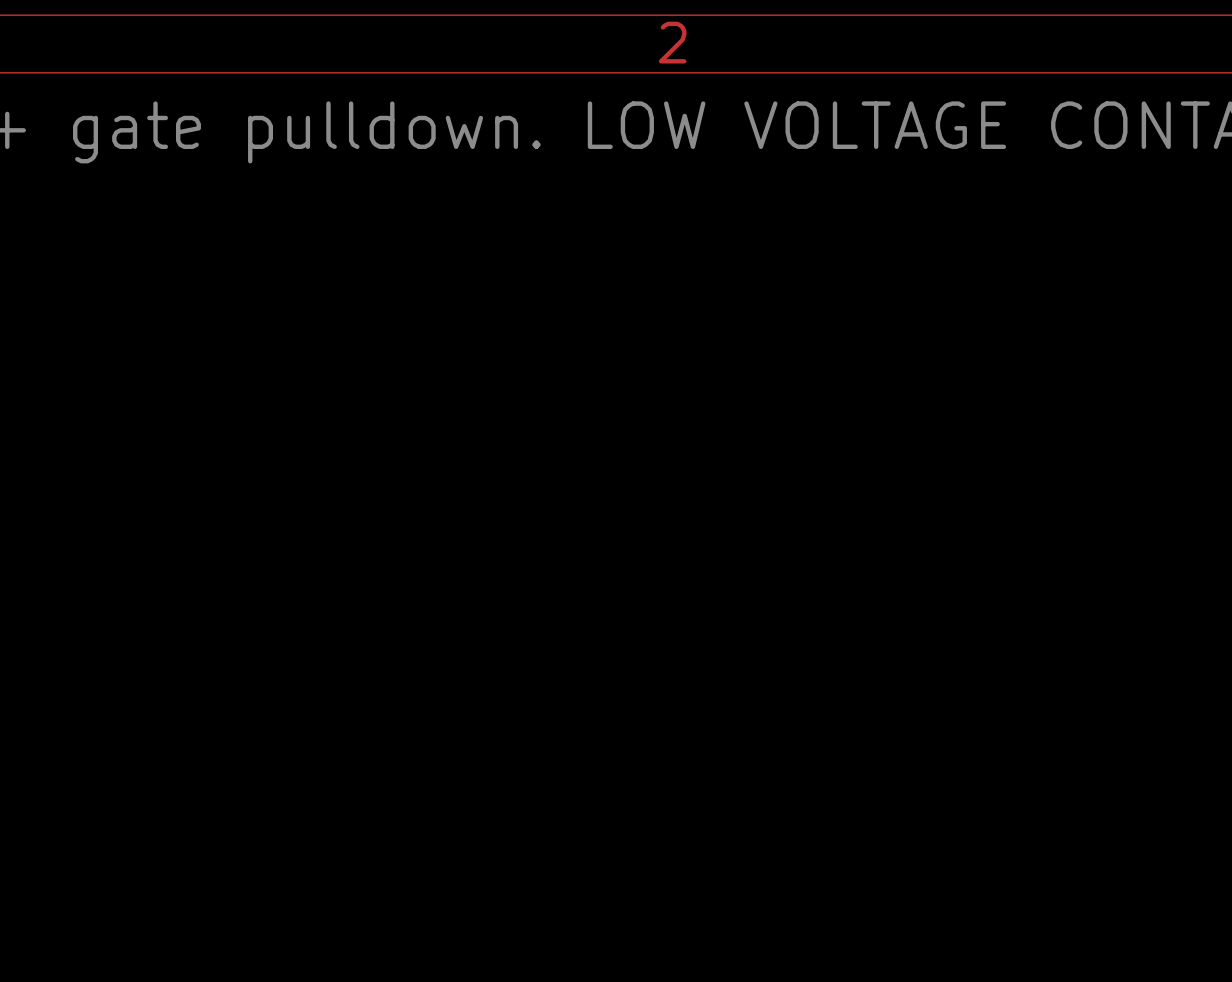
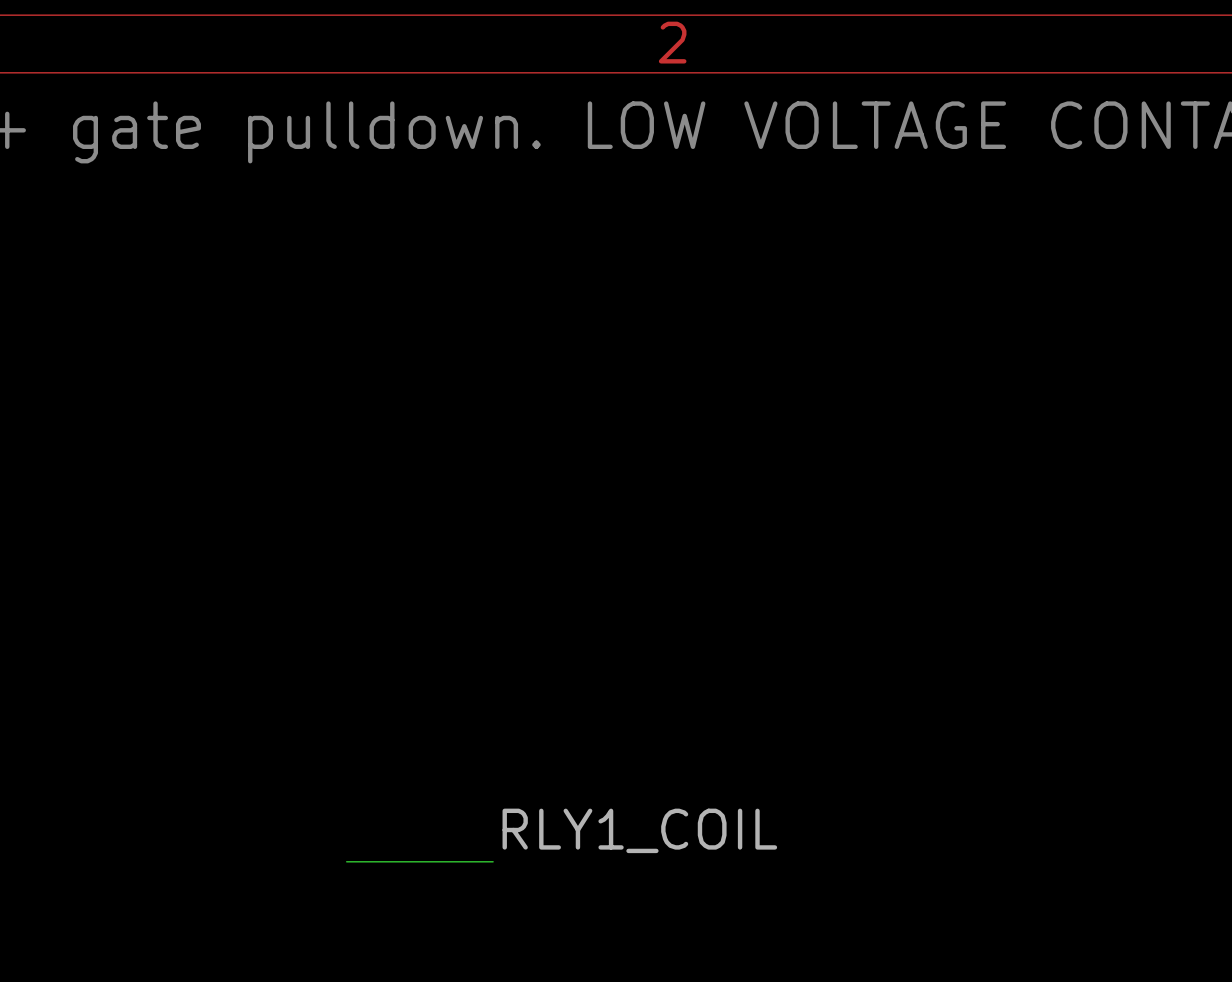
label: none -> RLY1_COIL (639, 830)
wire: none -> (346, 861) (493, 861)

